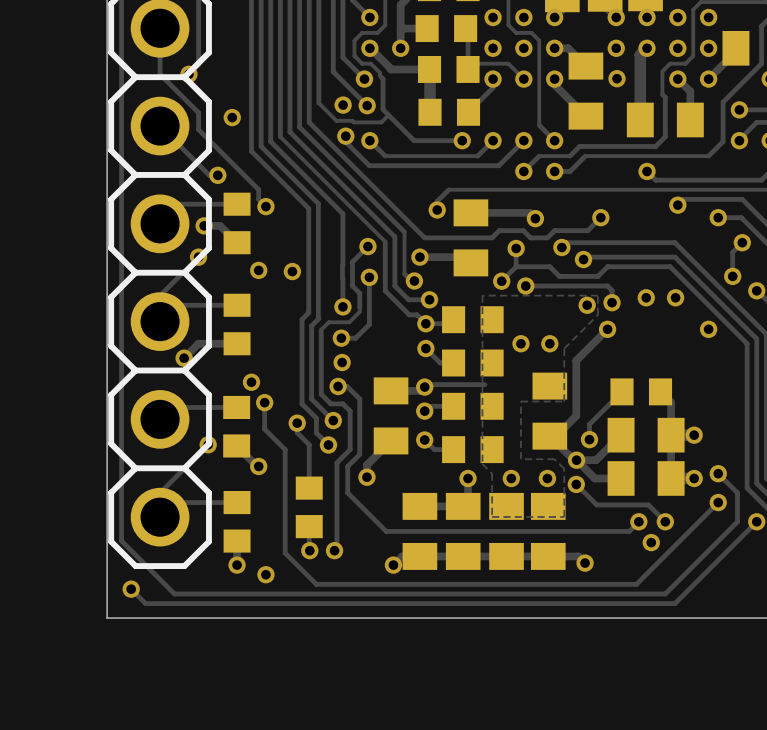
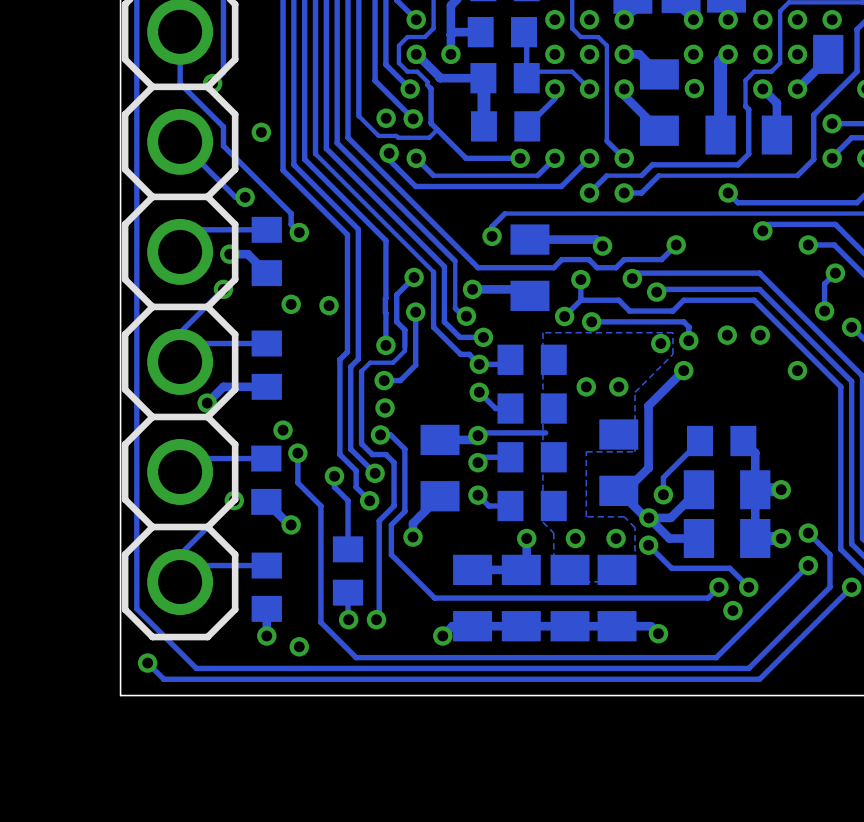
via: none -> (832, 19)

